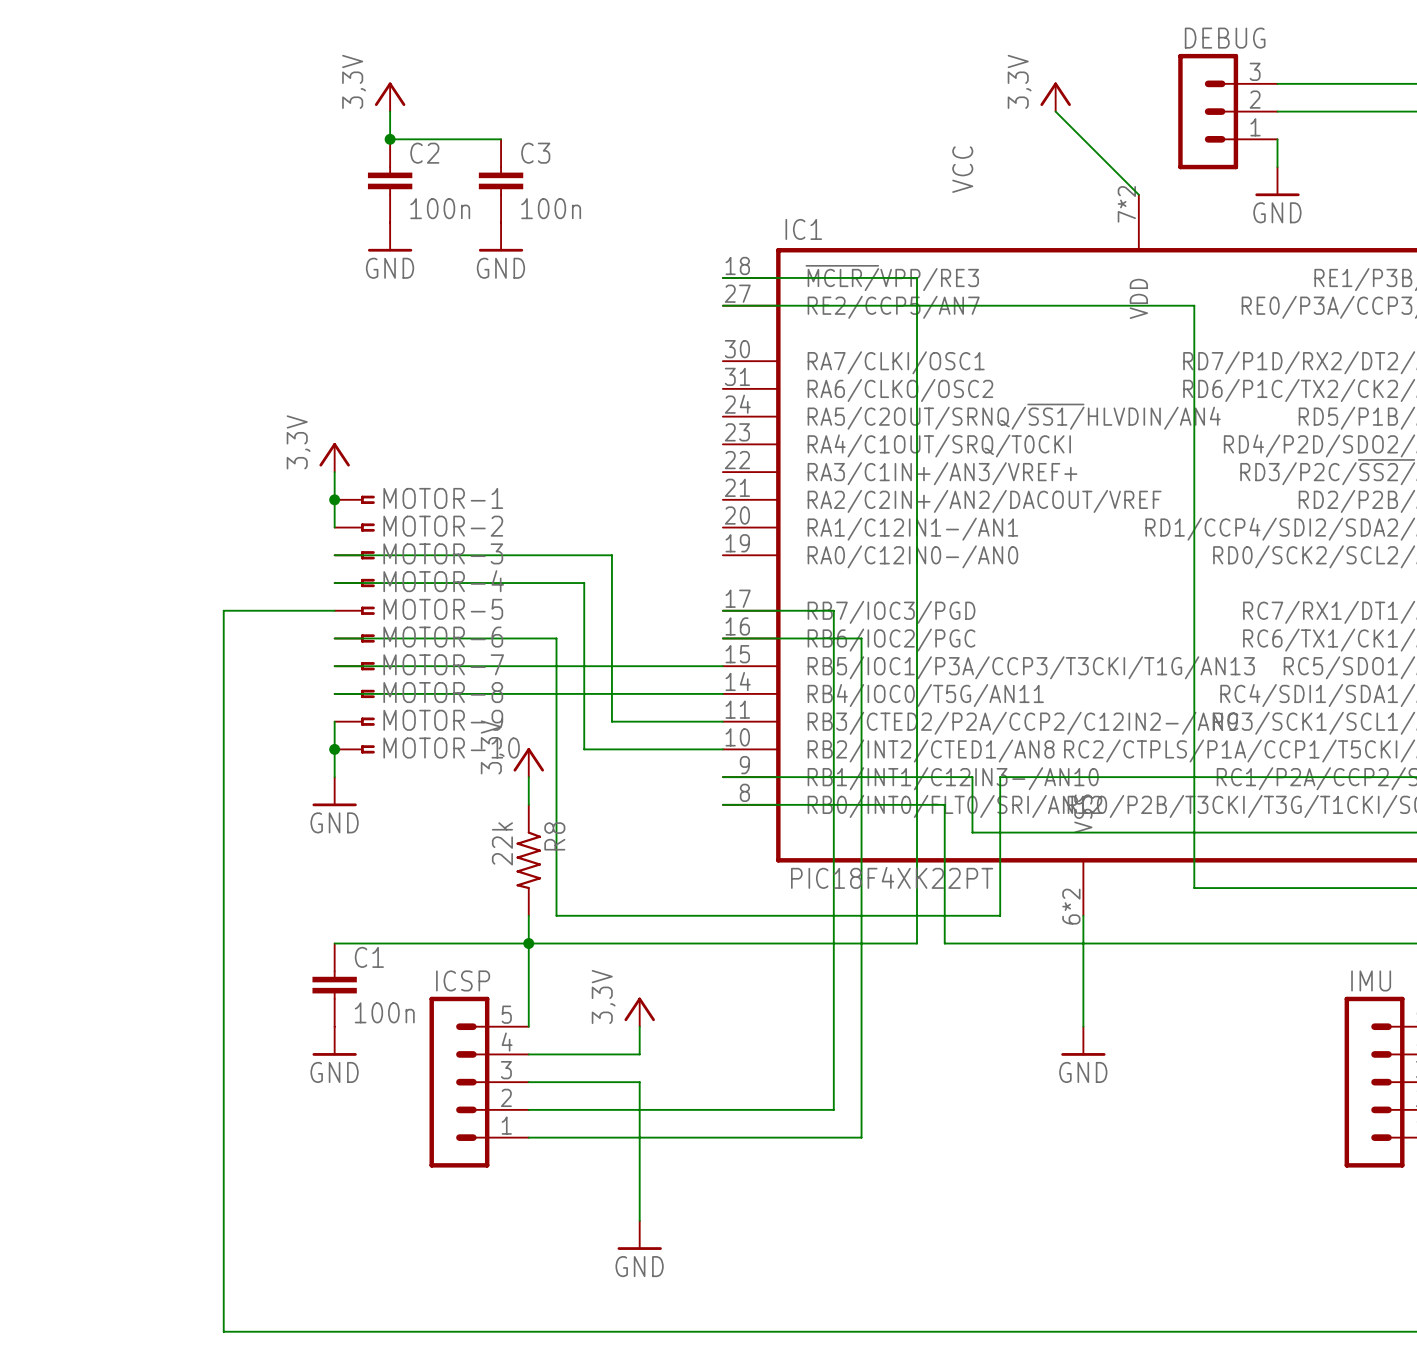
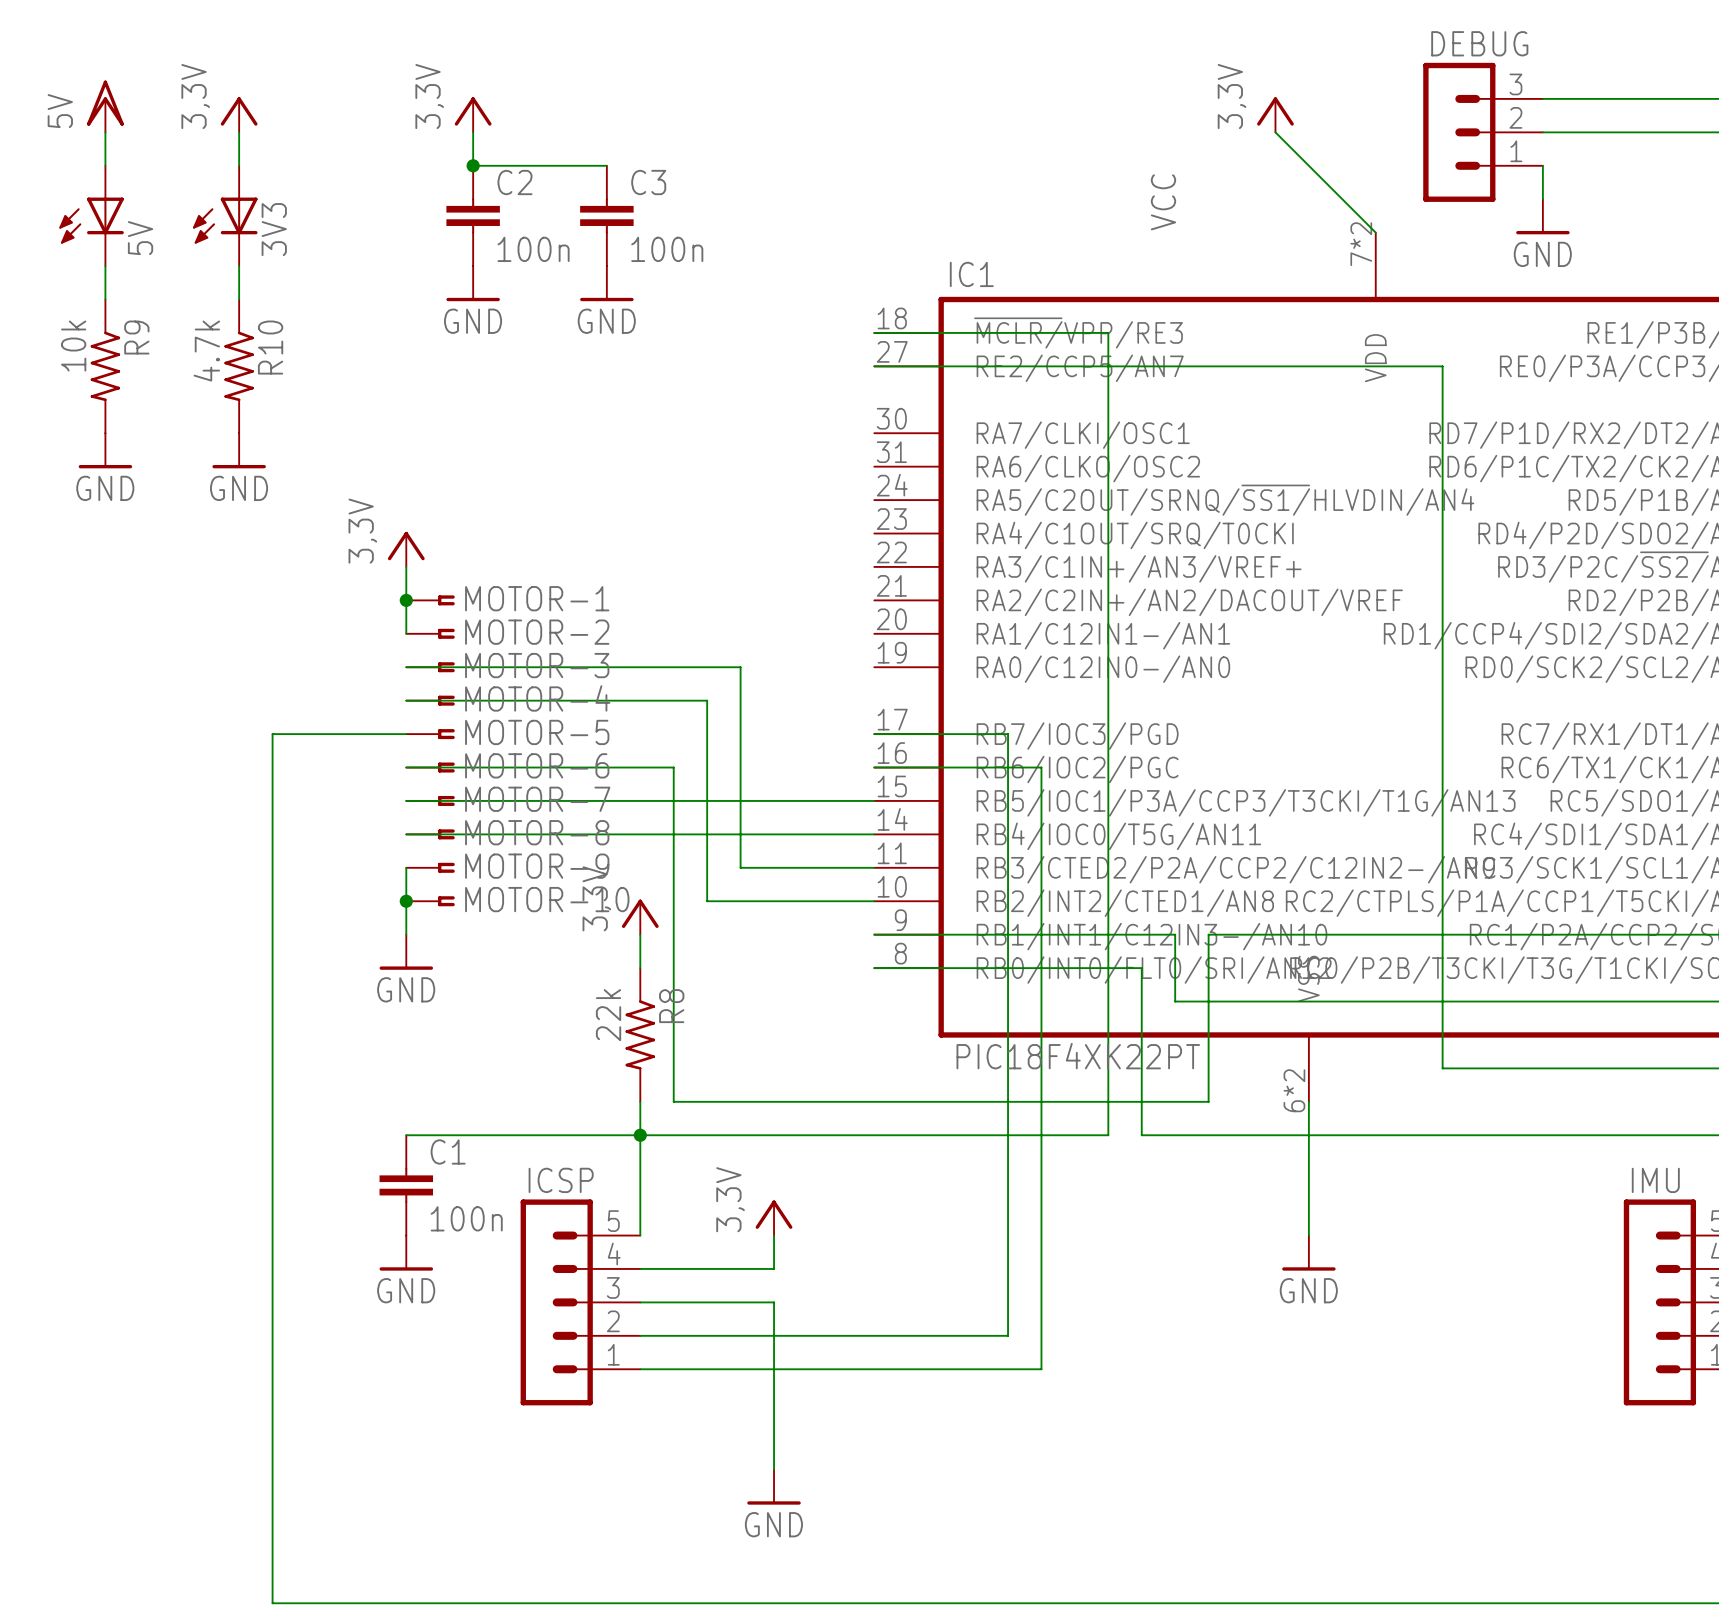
power symbol: none -> 5V (105, 106)
power symbol: none -> 3,3V (239, 114)
wire: none -> (105, 132) (105, 165)
wire: none -> (239, 132) (239, 165)
5V: none -> (91, 215)
3V3: none -> (225, 215)
wire: none -> (105, 266) (105, 299)
wire: none -> (239, 266) (239, 299)
R9: none -> 10k (105, 366)
R10: none -> 4.7k (239, 366)
power symbol: none -> GND (105, 450)
power symbol: none -> GND (239, 450)

